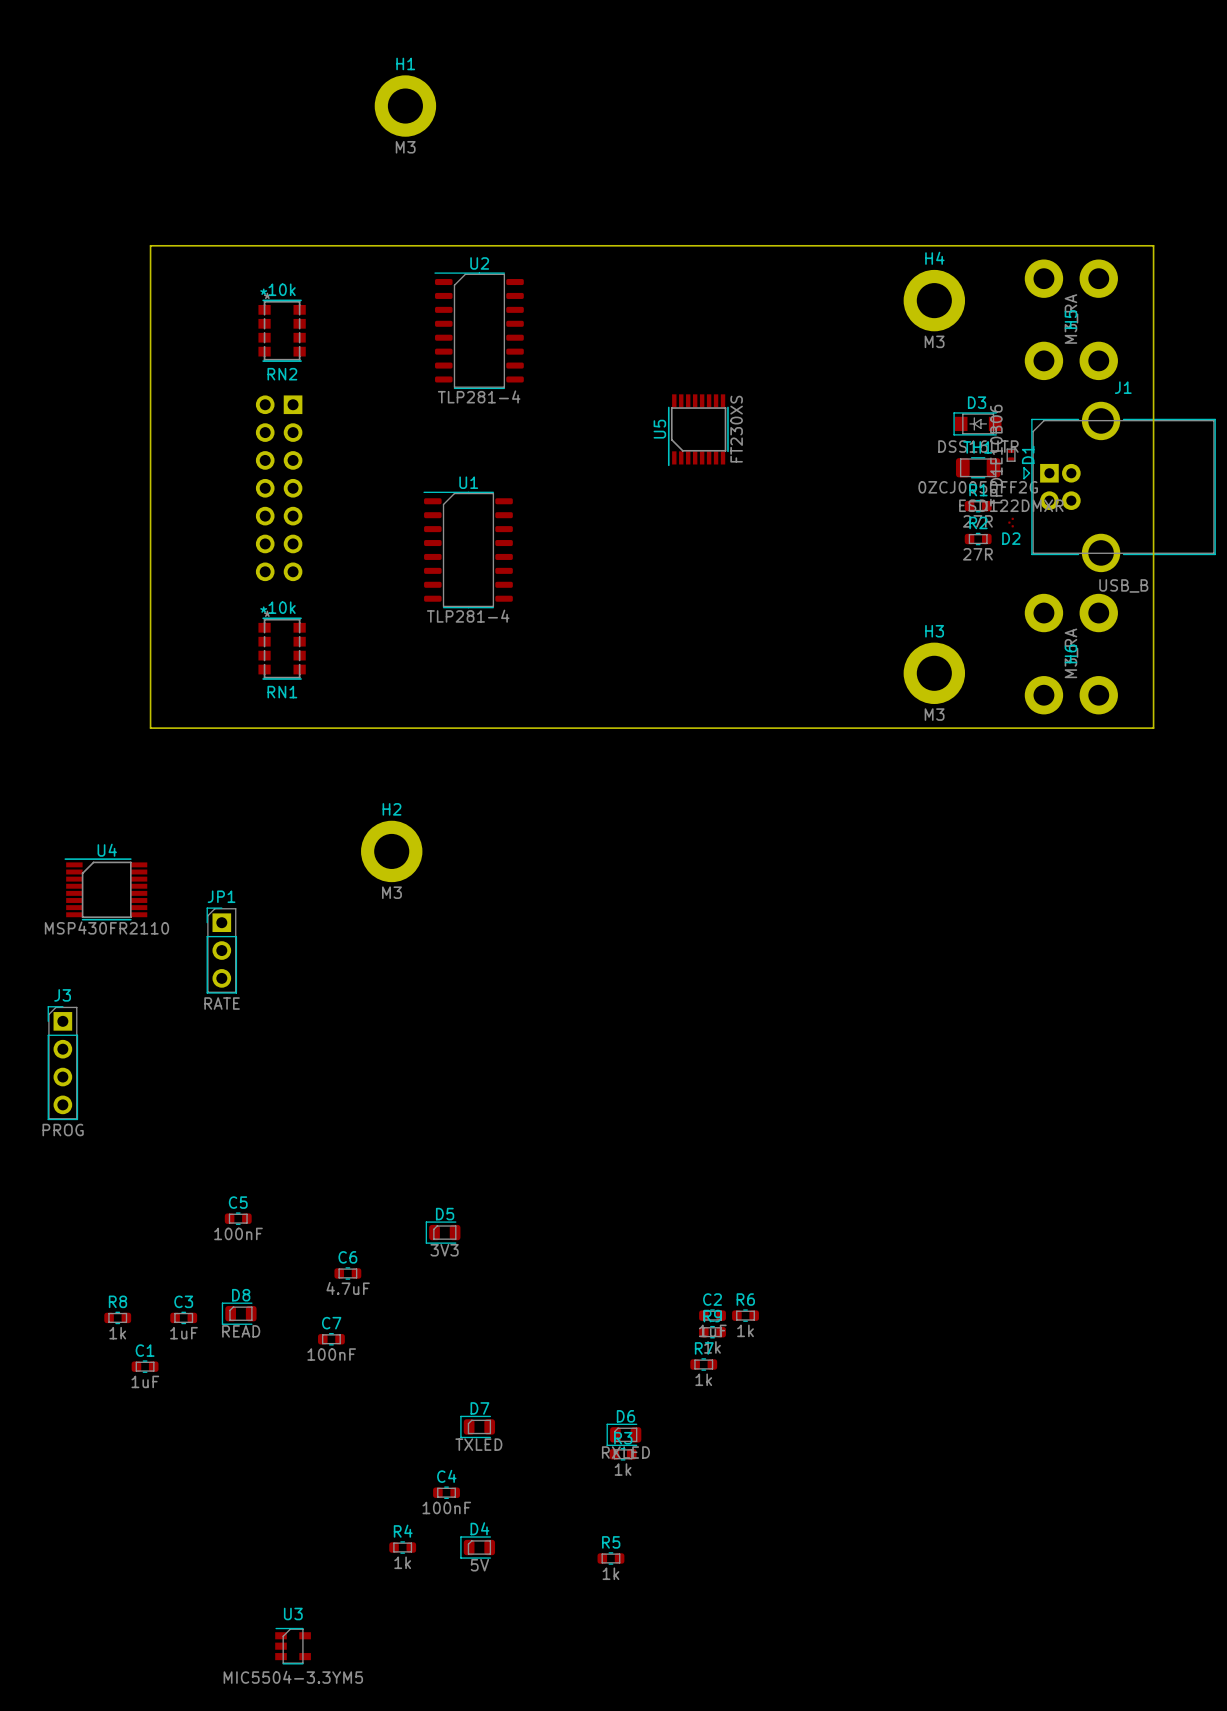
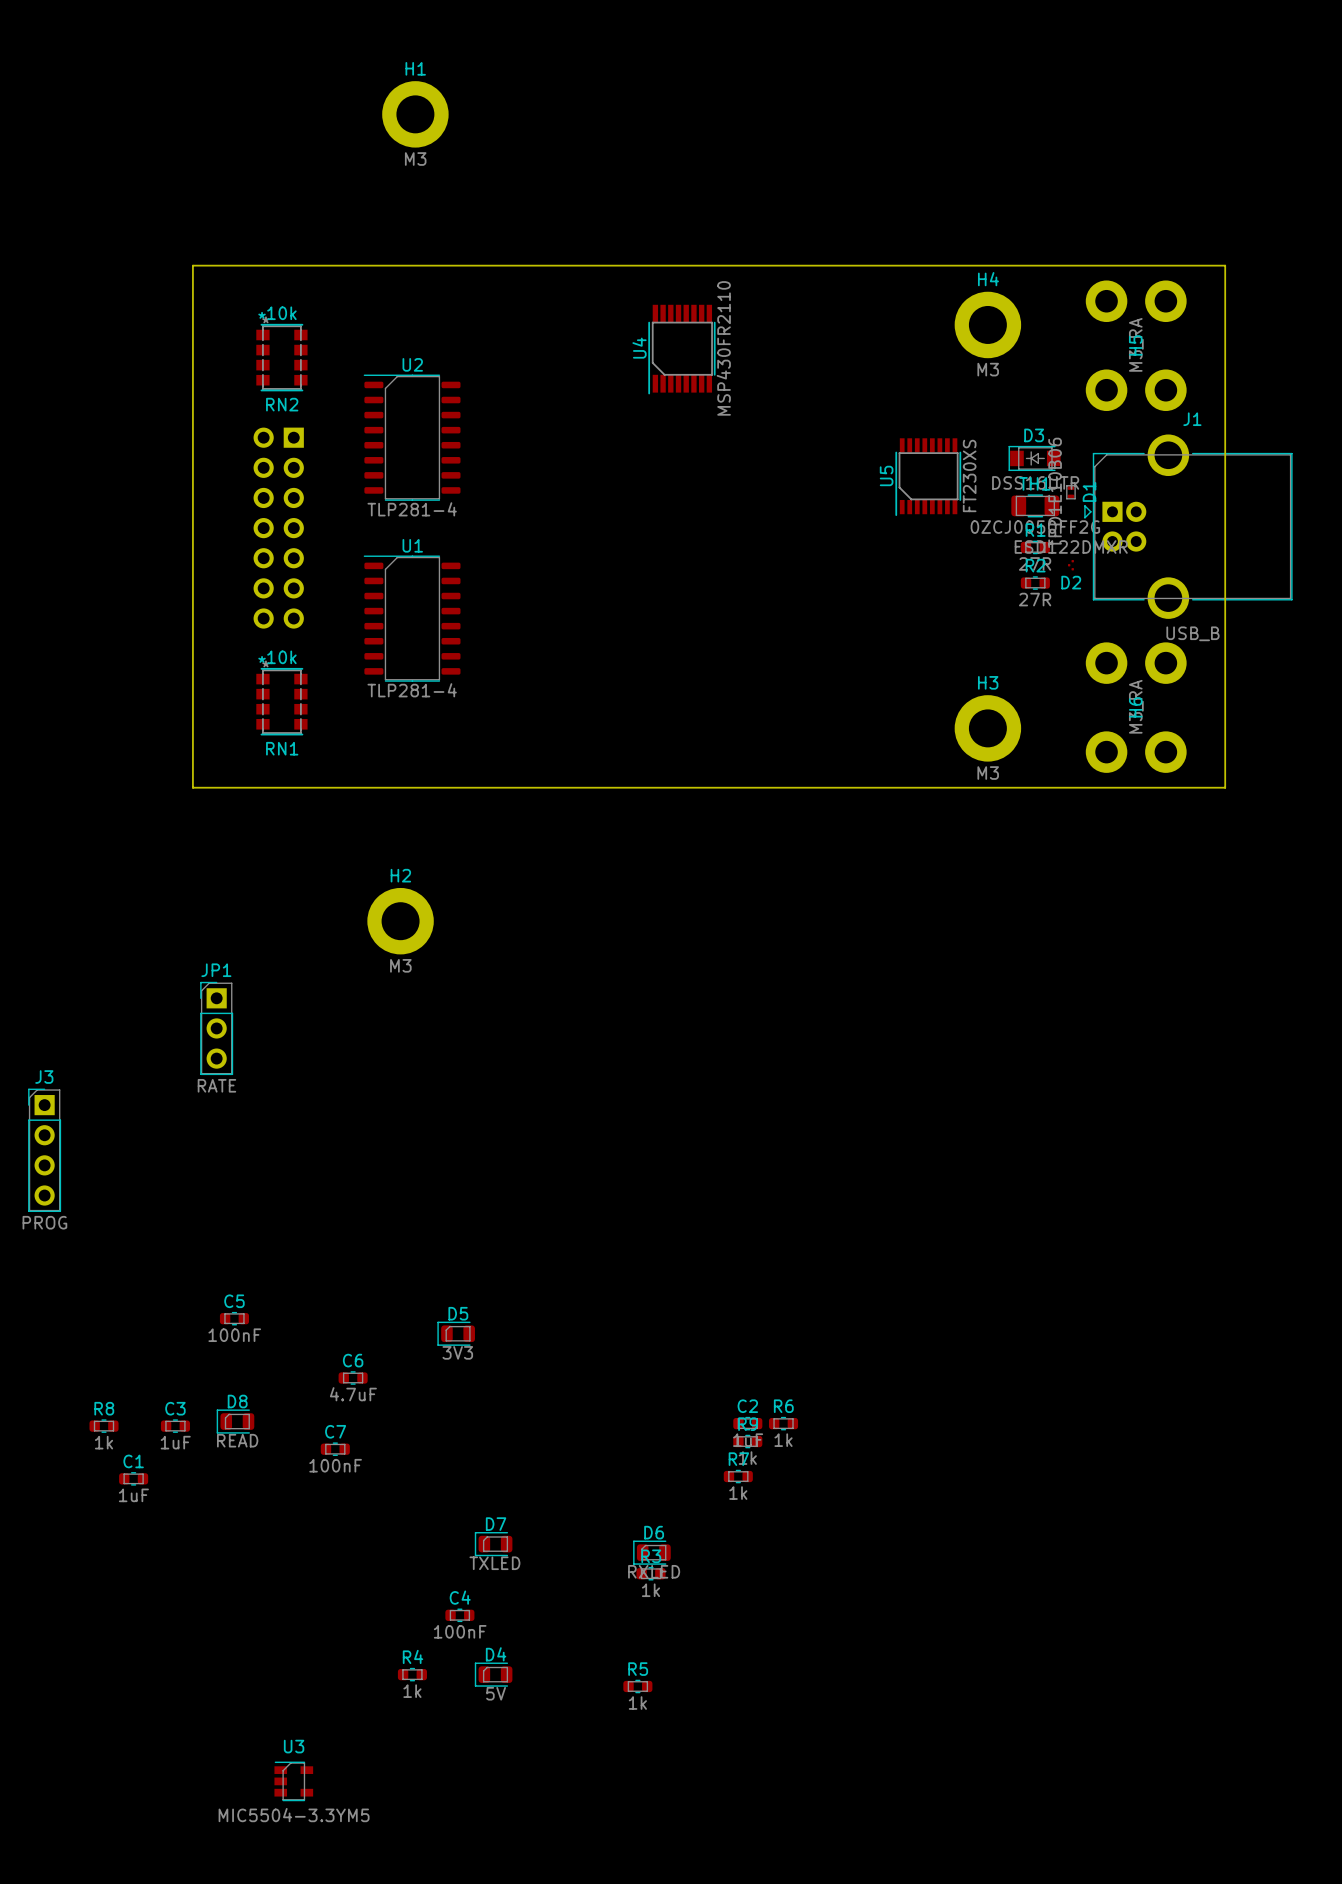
board edge: (199, 245) (150, 245) (150, 728) (199, 728) -> (192, 265) (192, 787)
U2 position: (479, 330) -> (412, 437)
U5 position: (698, 430) -> (928, 477)
U1 position: (468, 549) -> (412, 618)
U4 rotation: 0° (105, 889) -> 90° counterclockwise (681, 349)
U4 position: (105, 889) -> (681, 349)

